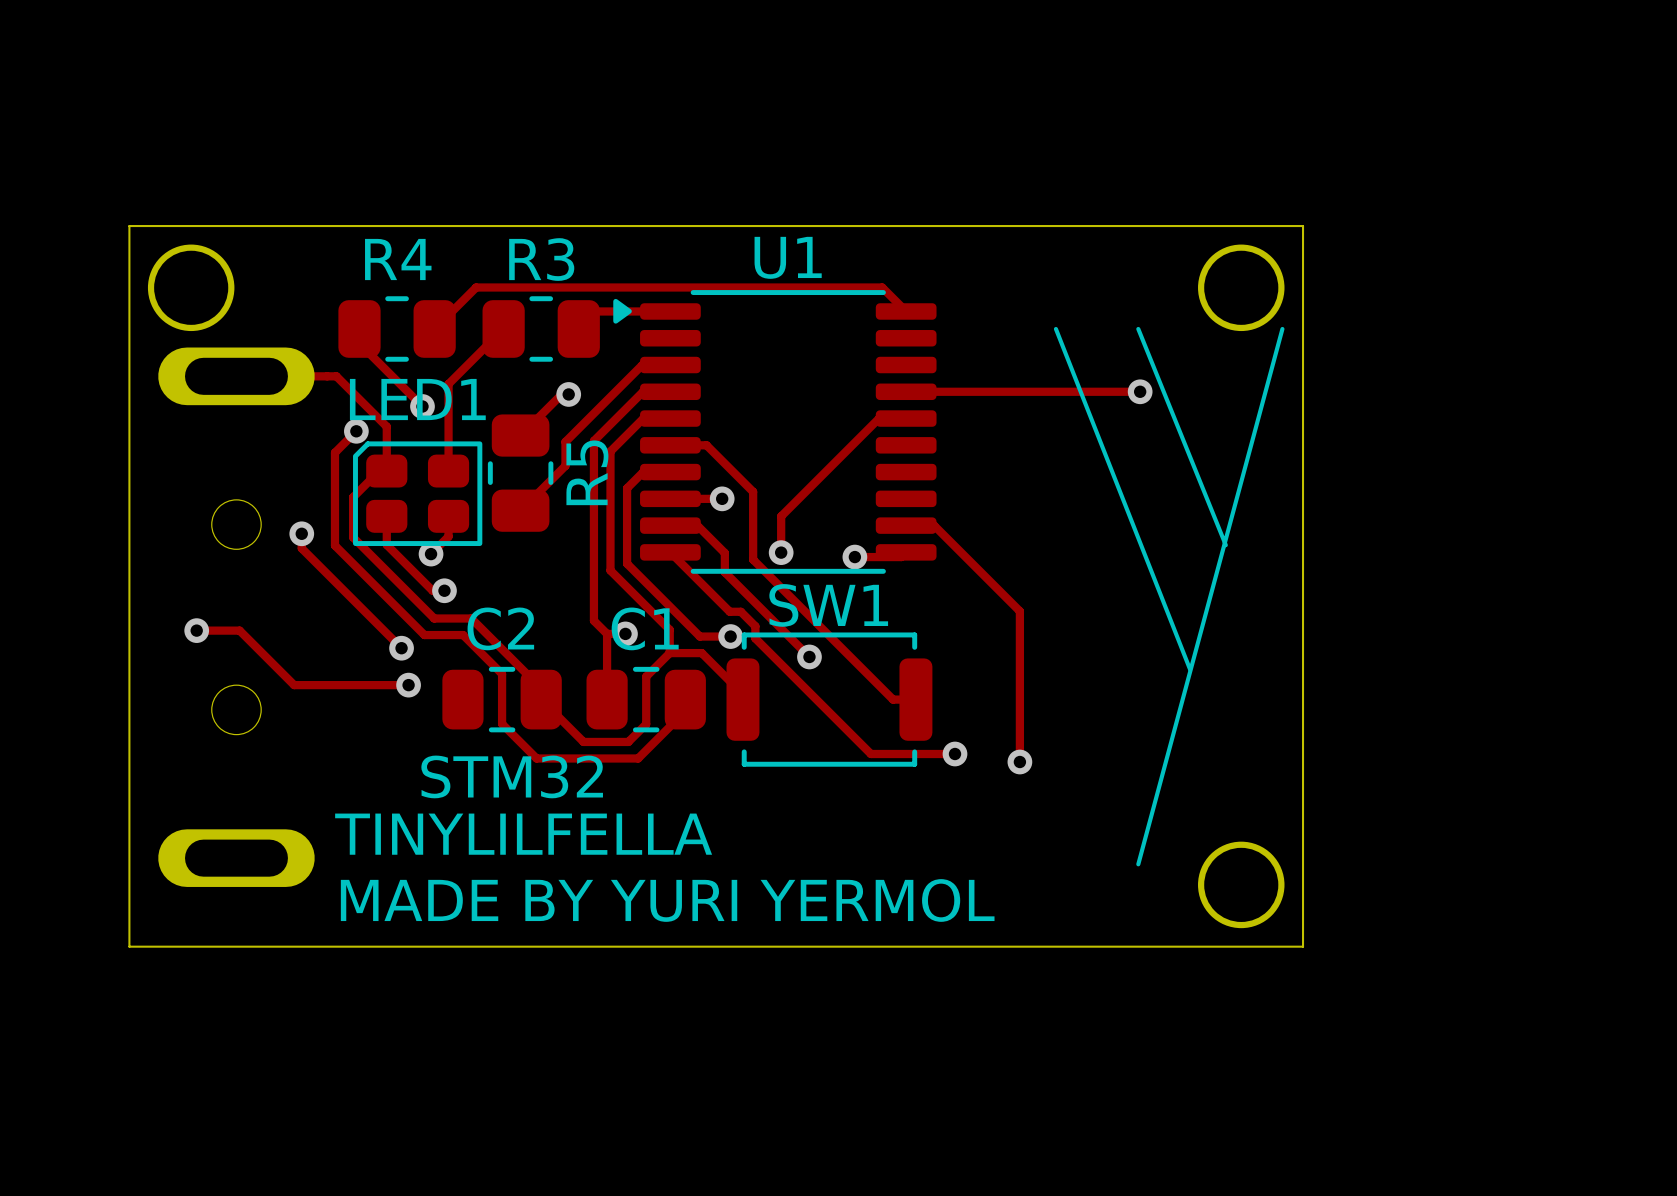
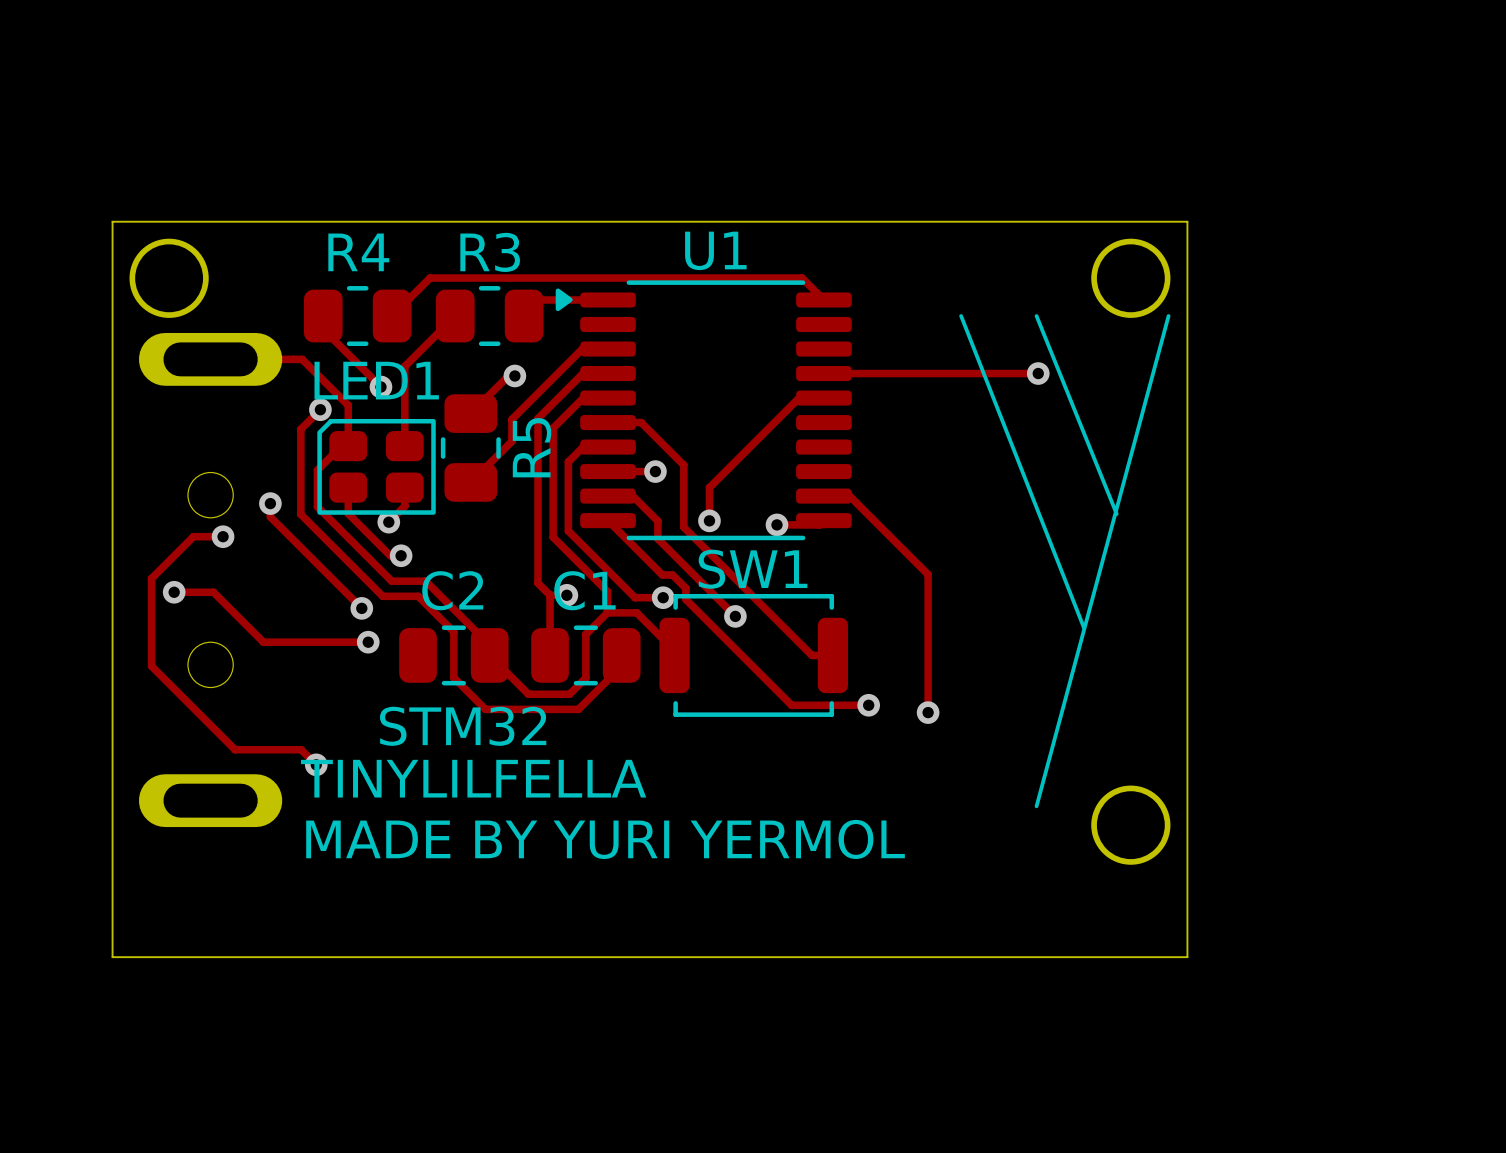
track: none -> (223, 536) (193, 536) (151, 578) (151, 666) (235, 749) (301, 749) (316, 764)
via: none -> (223, 536)
via: none -> (316, 764)
board edge: (129, 946) (1303, 946) -> (112, 881) (112, 957) (1187, 957) (1187, 881)

